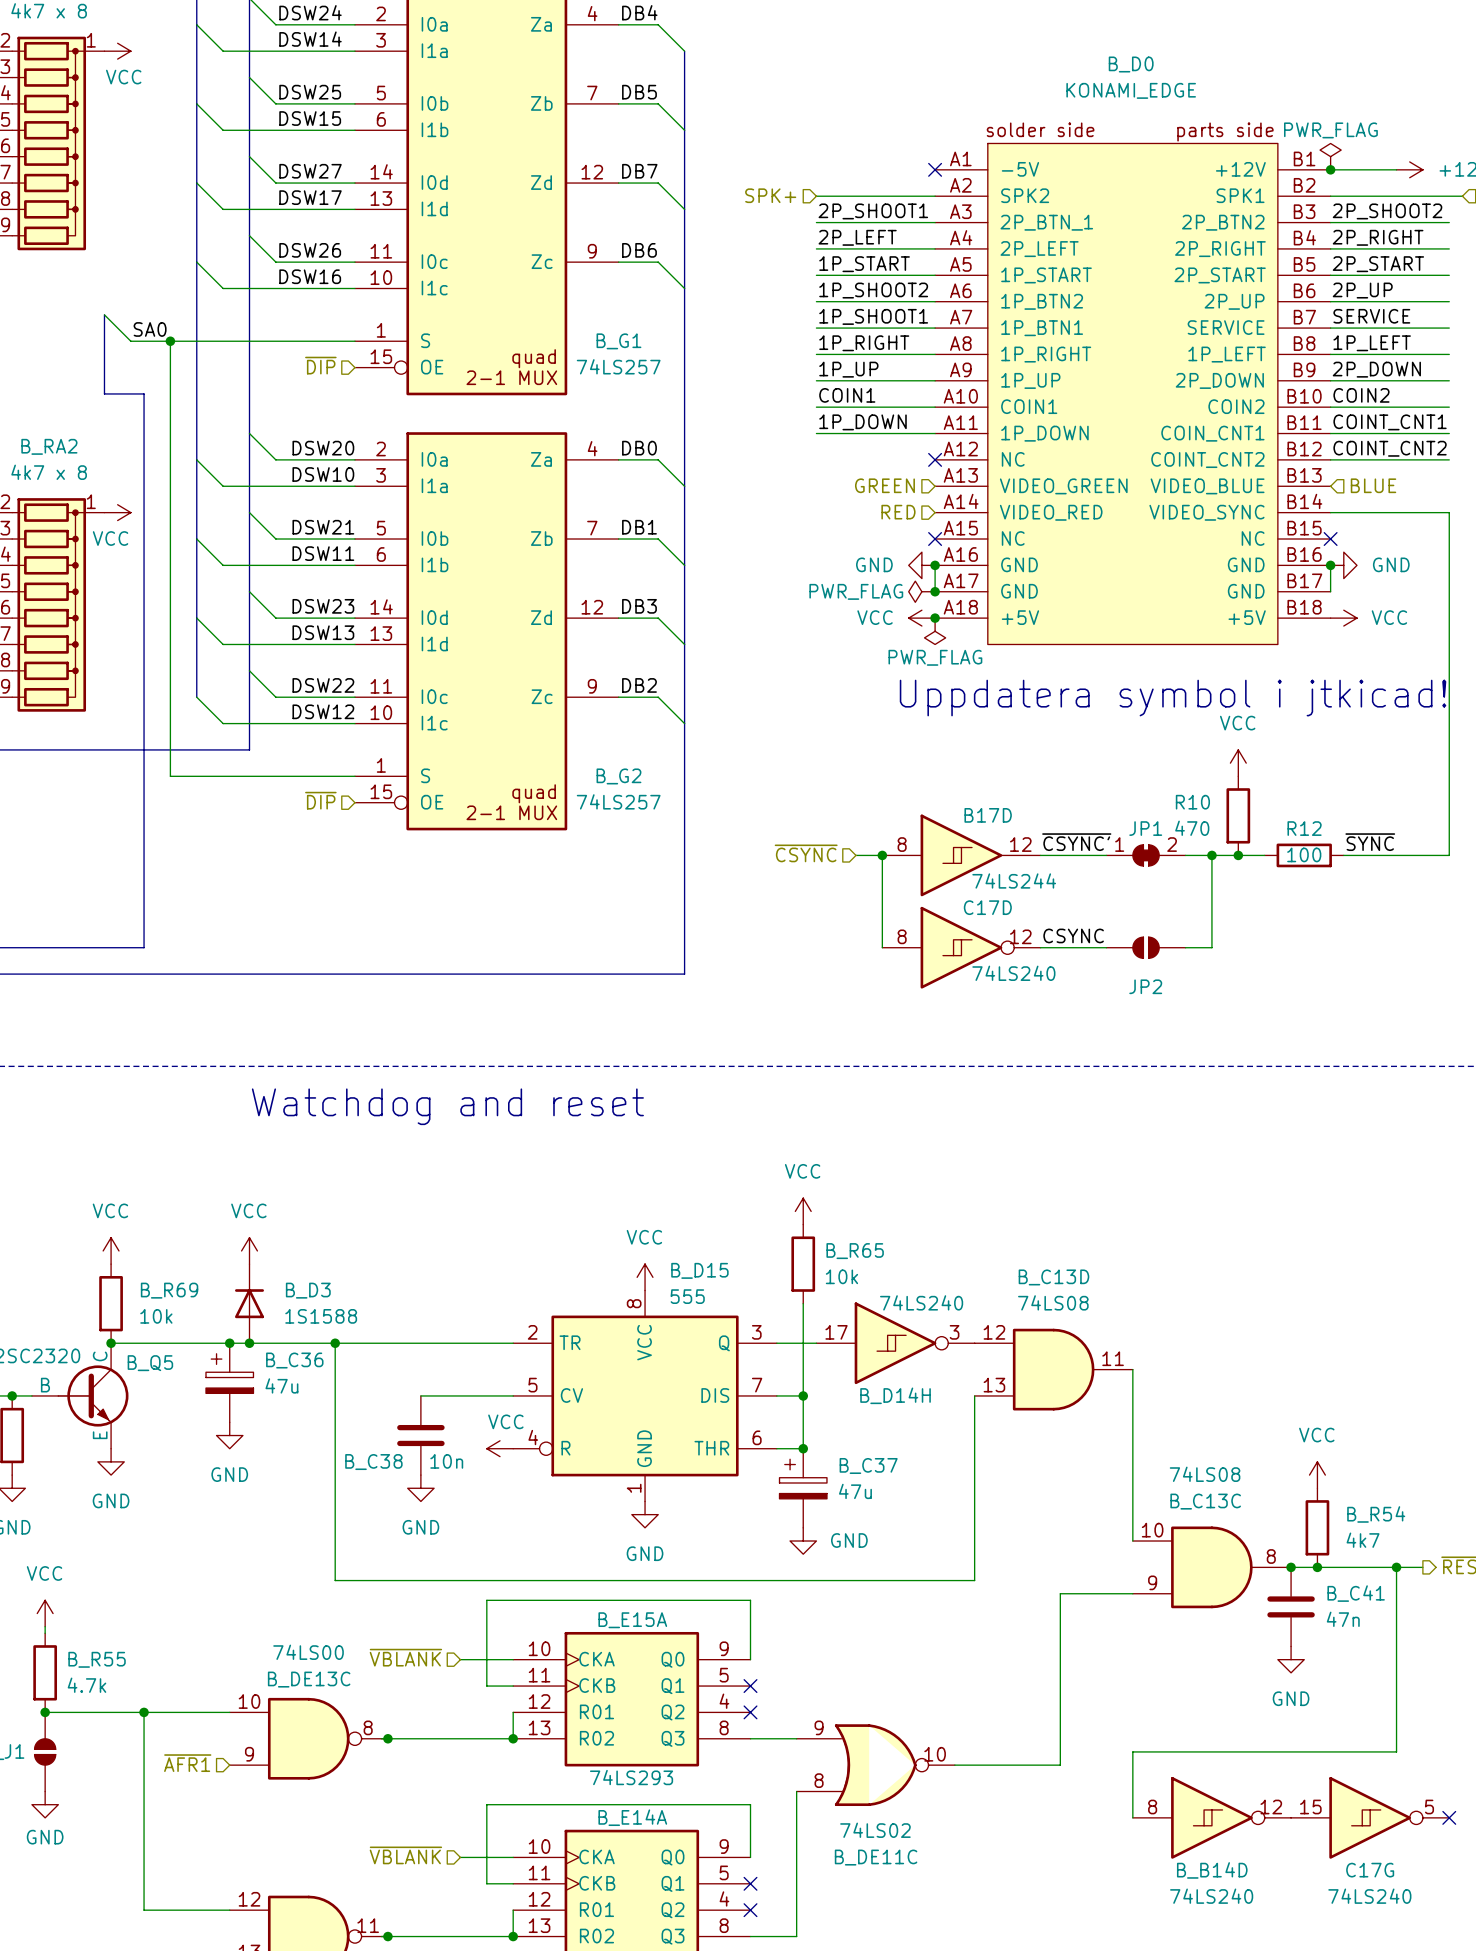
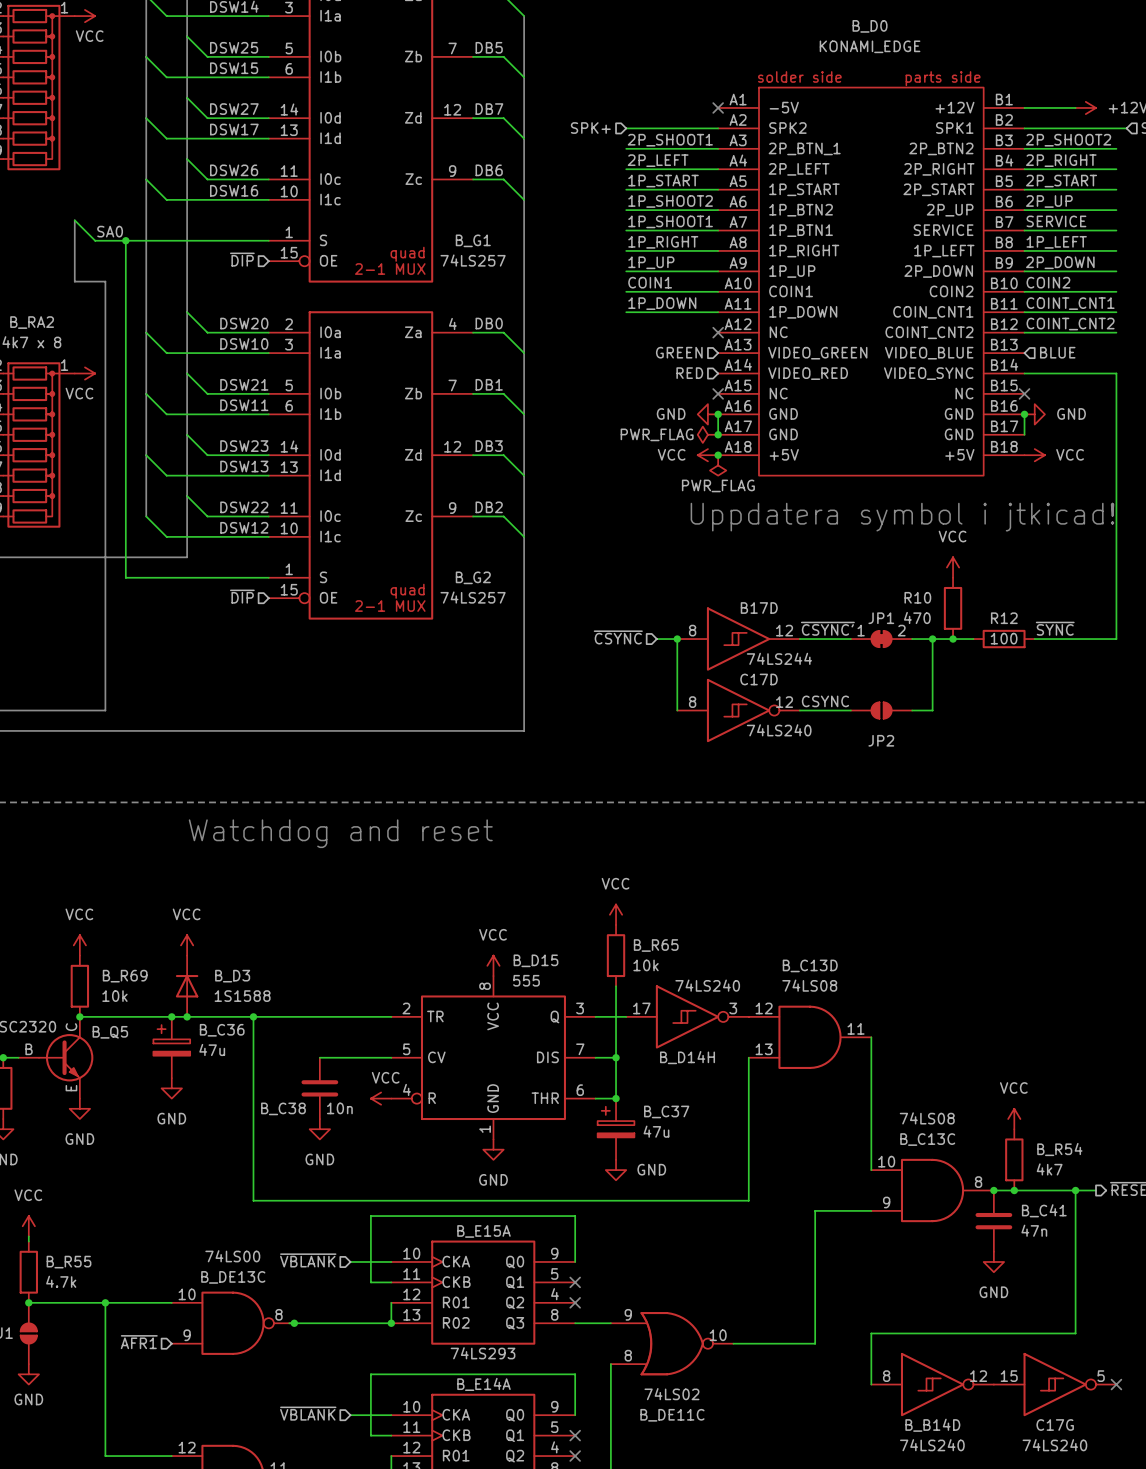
power symbol: PWR_FLAG (1330, 156) -> none
junction: (1330, 169) -> none

